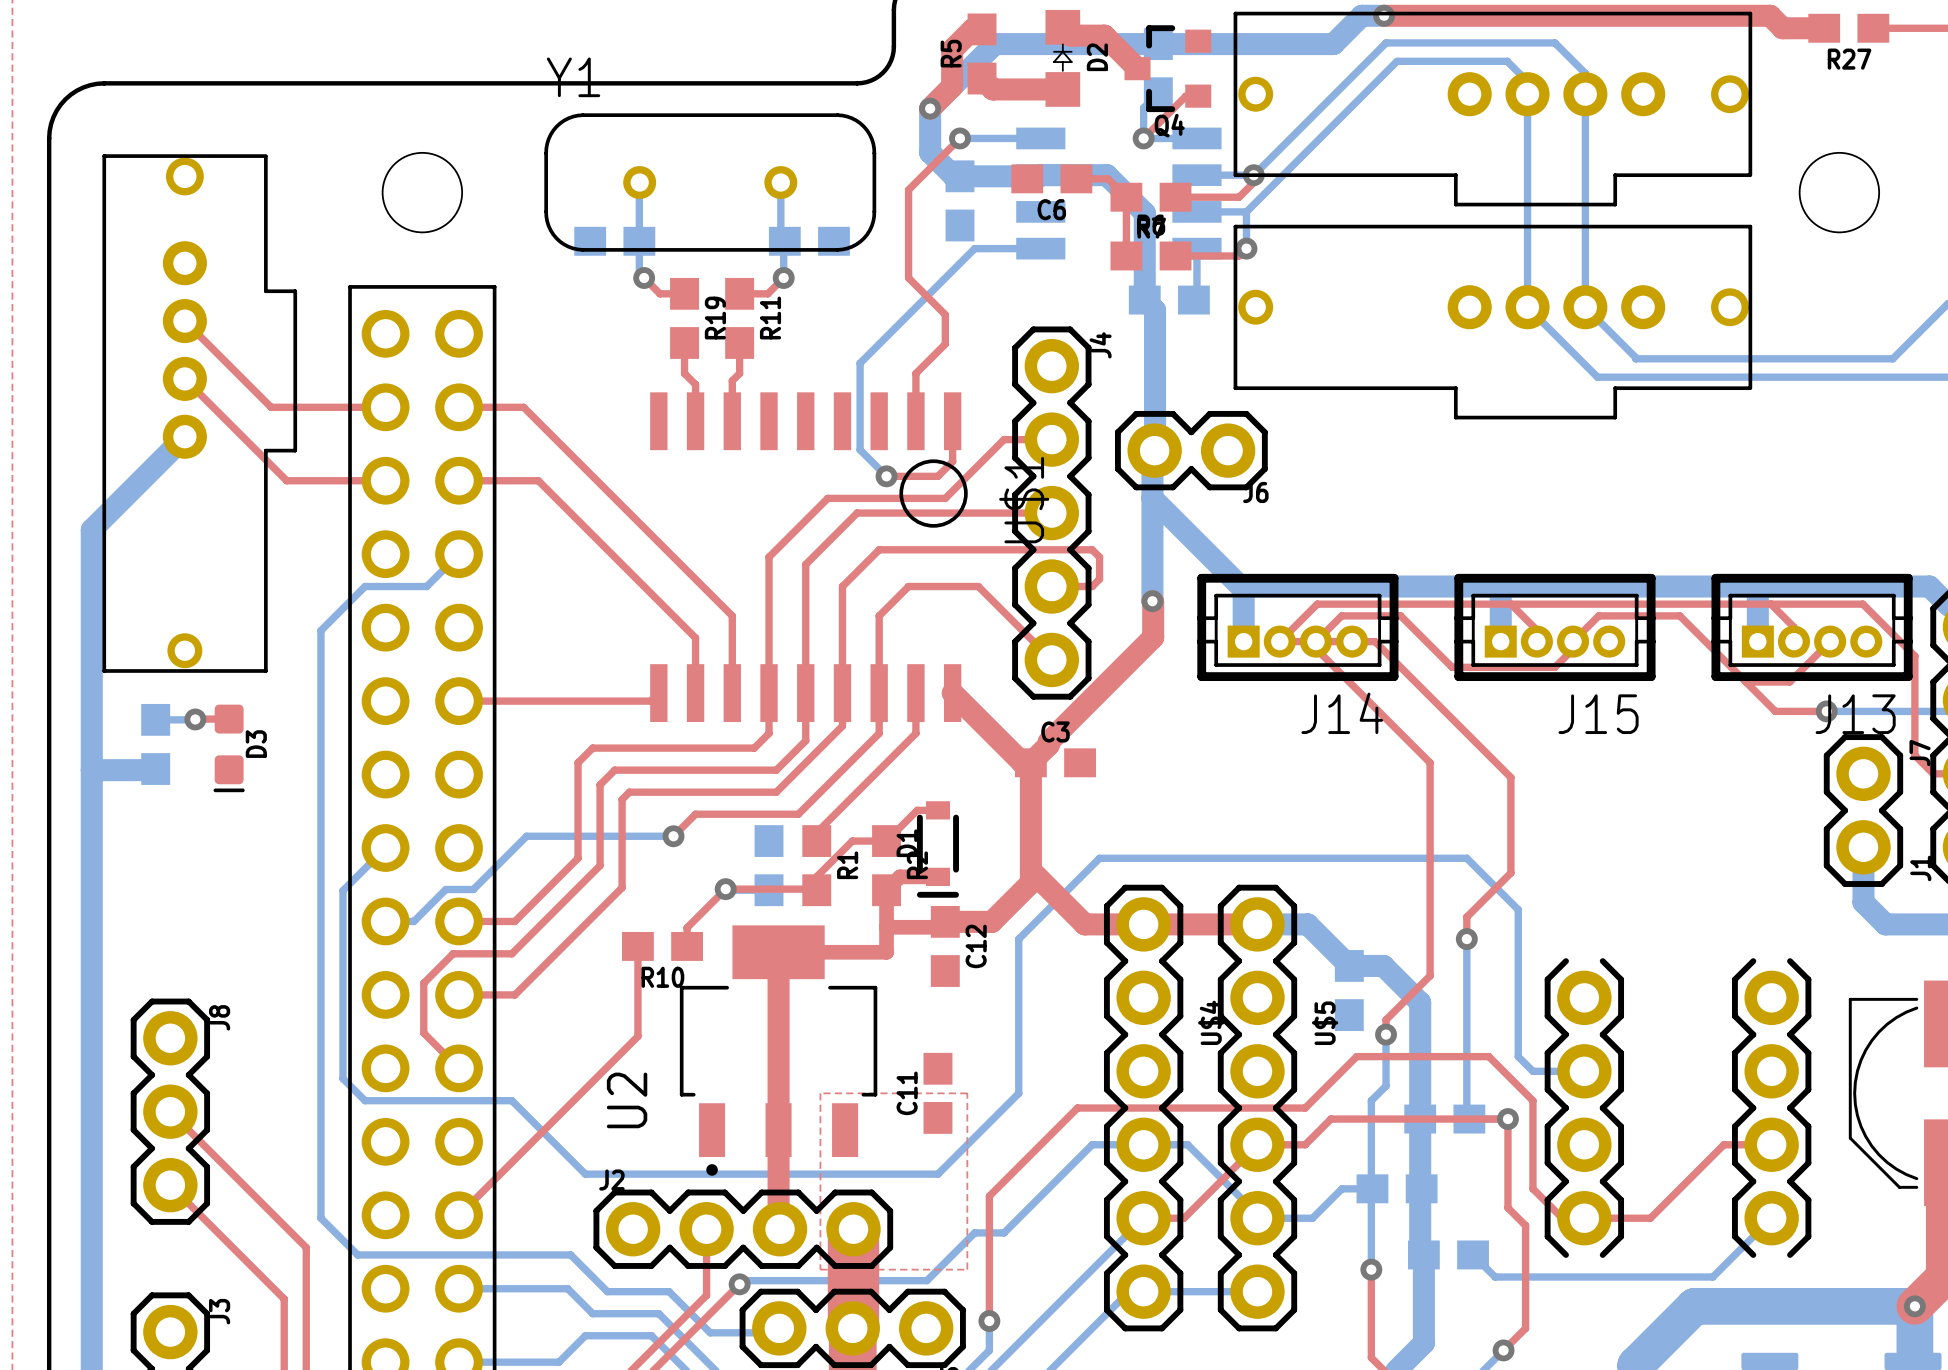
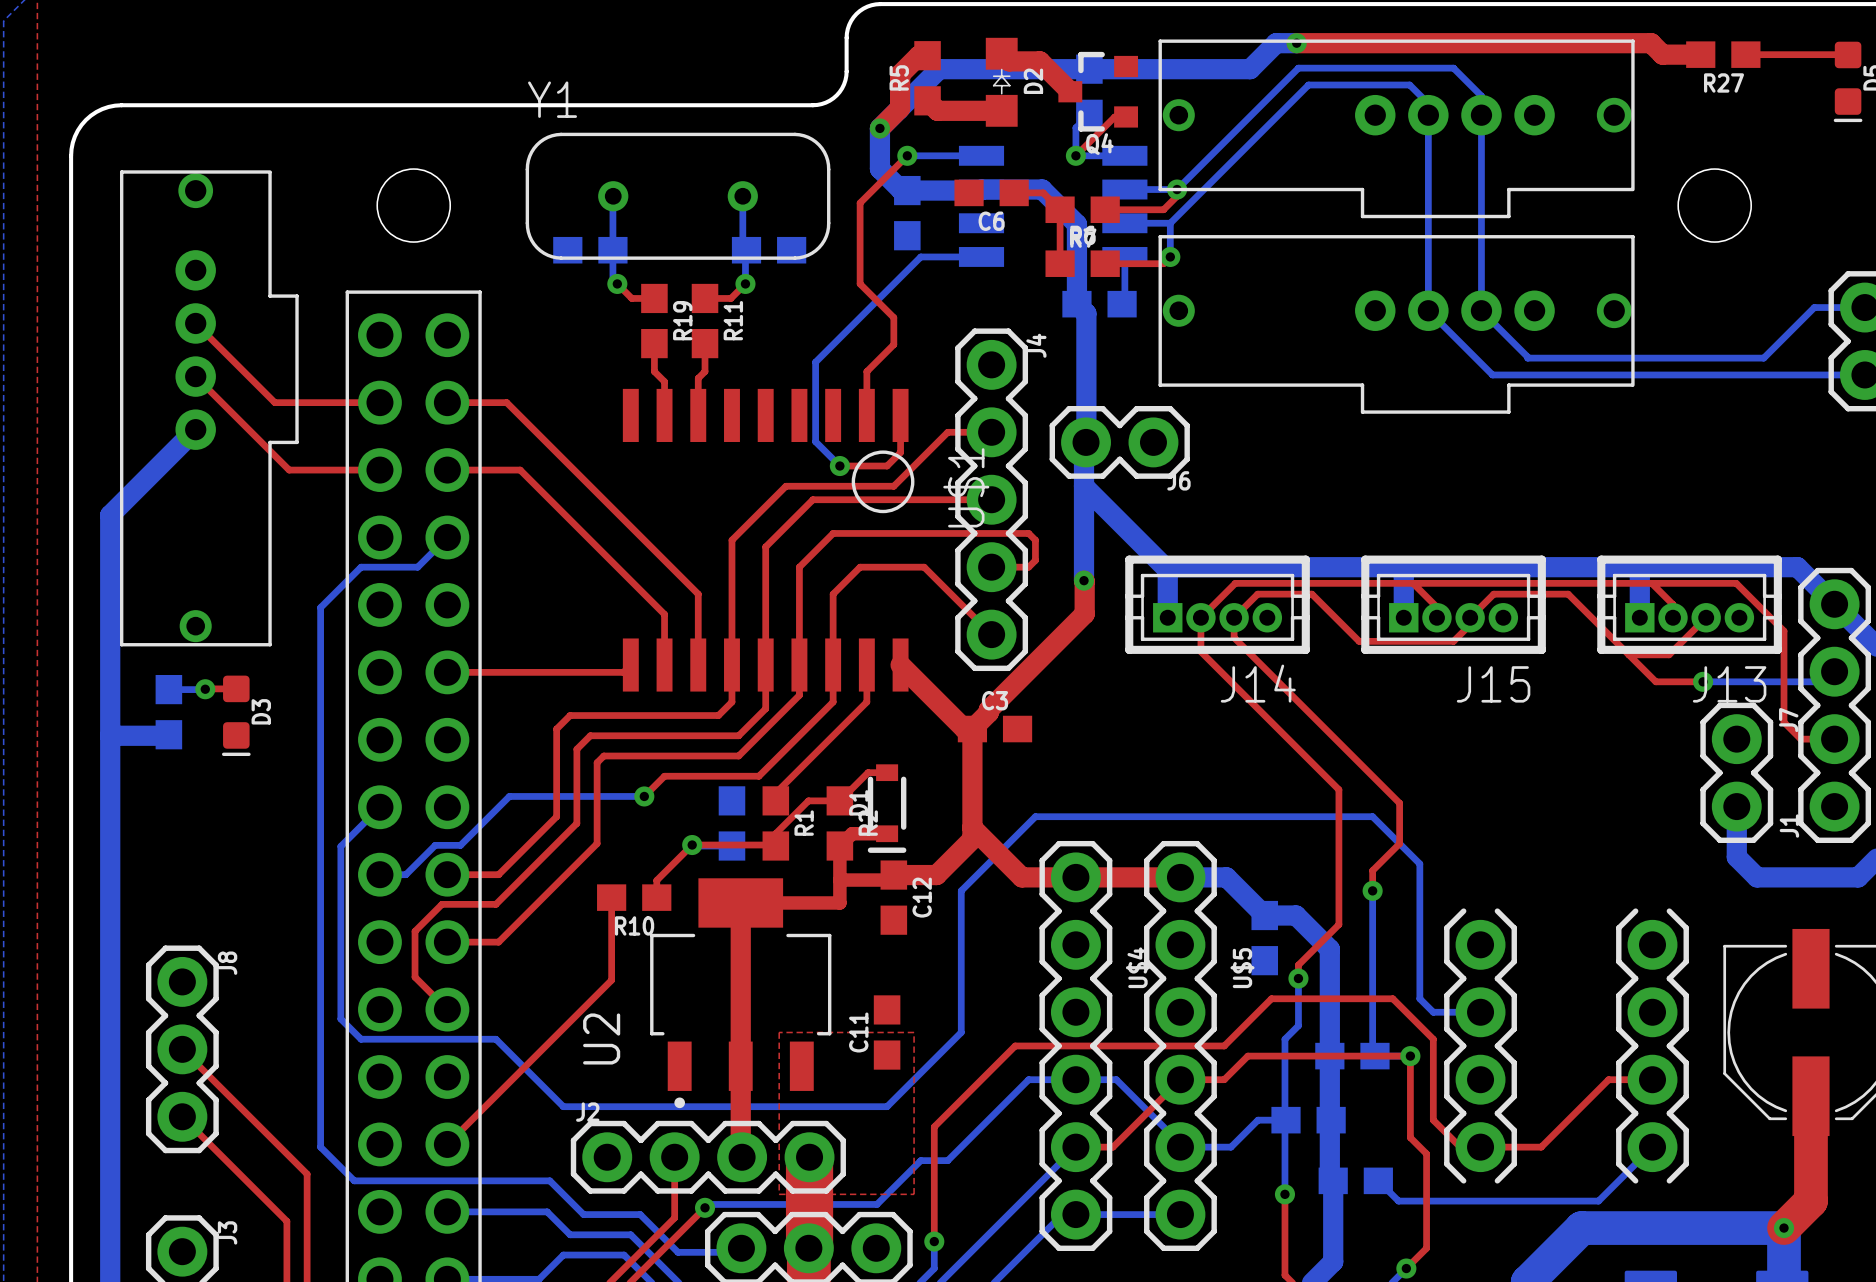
top track: (1279, 641) (1308, 641) (1430, 762) (1430, 828) -> (1200, 617) (1200, 651) (1338, 789)
top track: (1315, 641) (1375, 641) (1510, 777) (1510, 872) (1496, 887) -> (1234, 617) (1234, 637) (1399, 803) (1399, 843)

